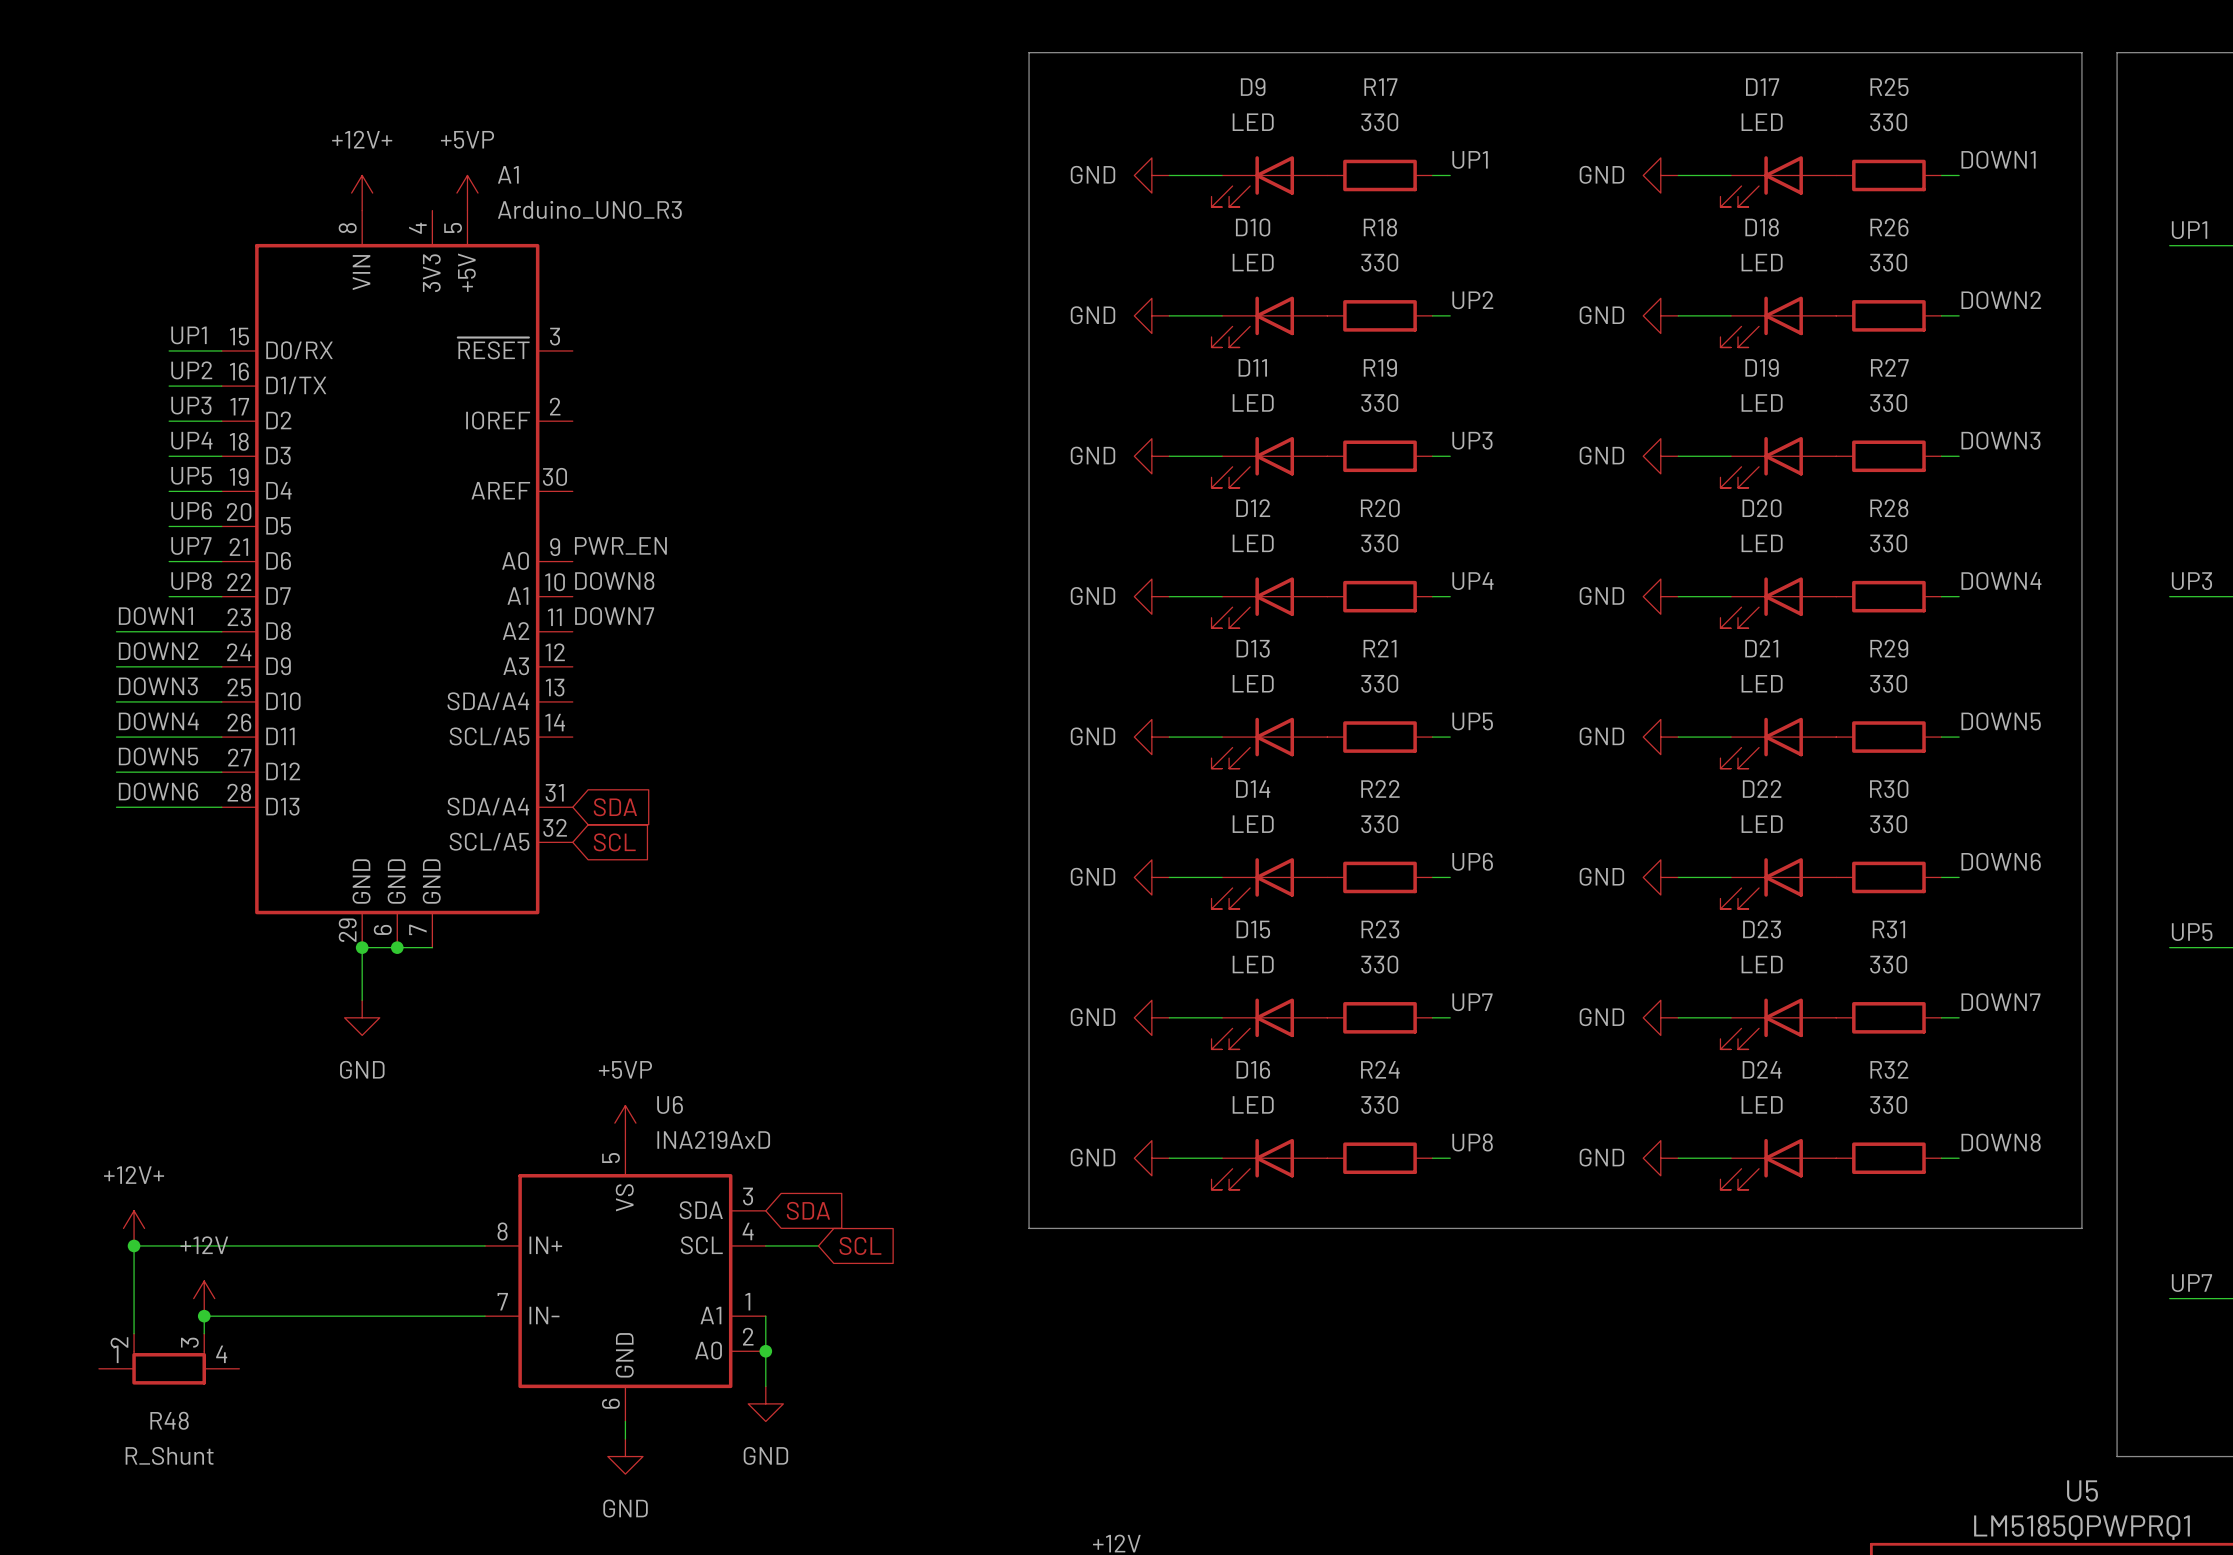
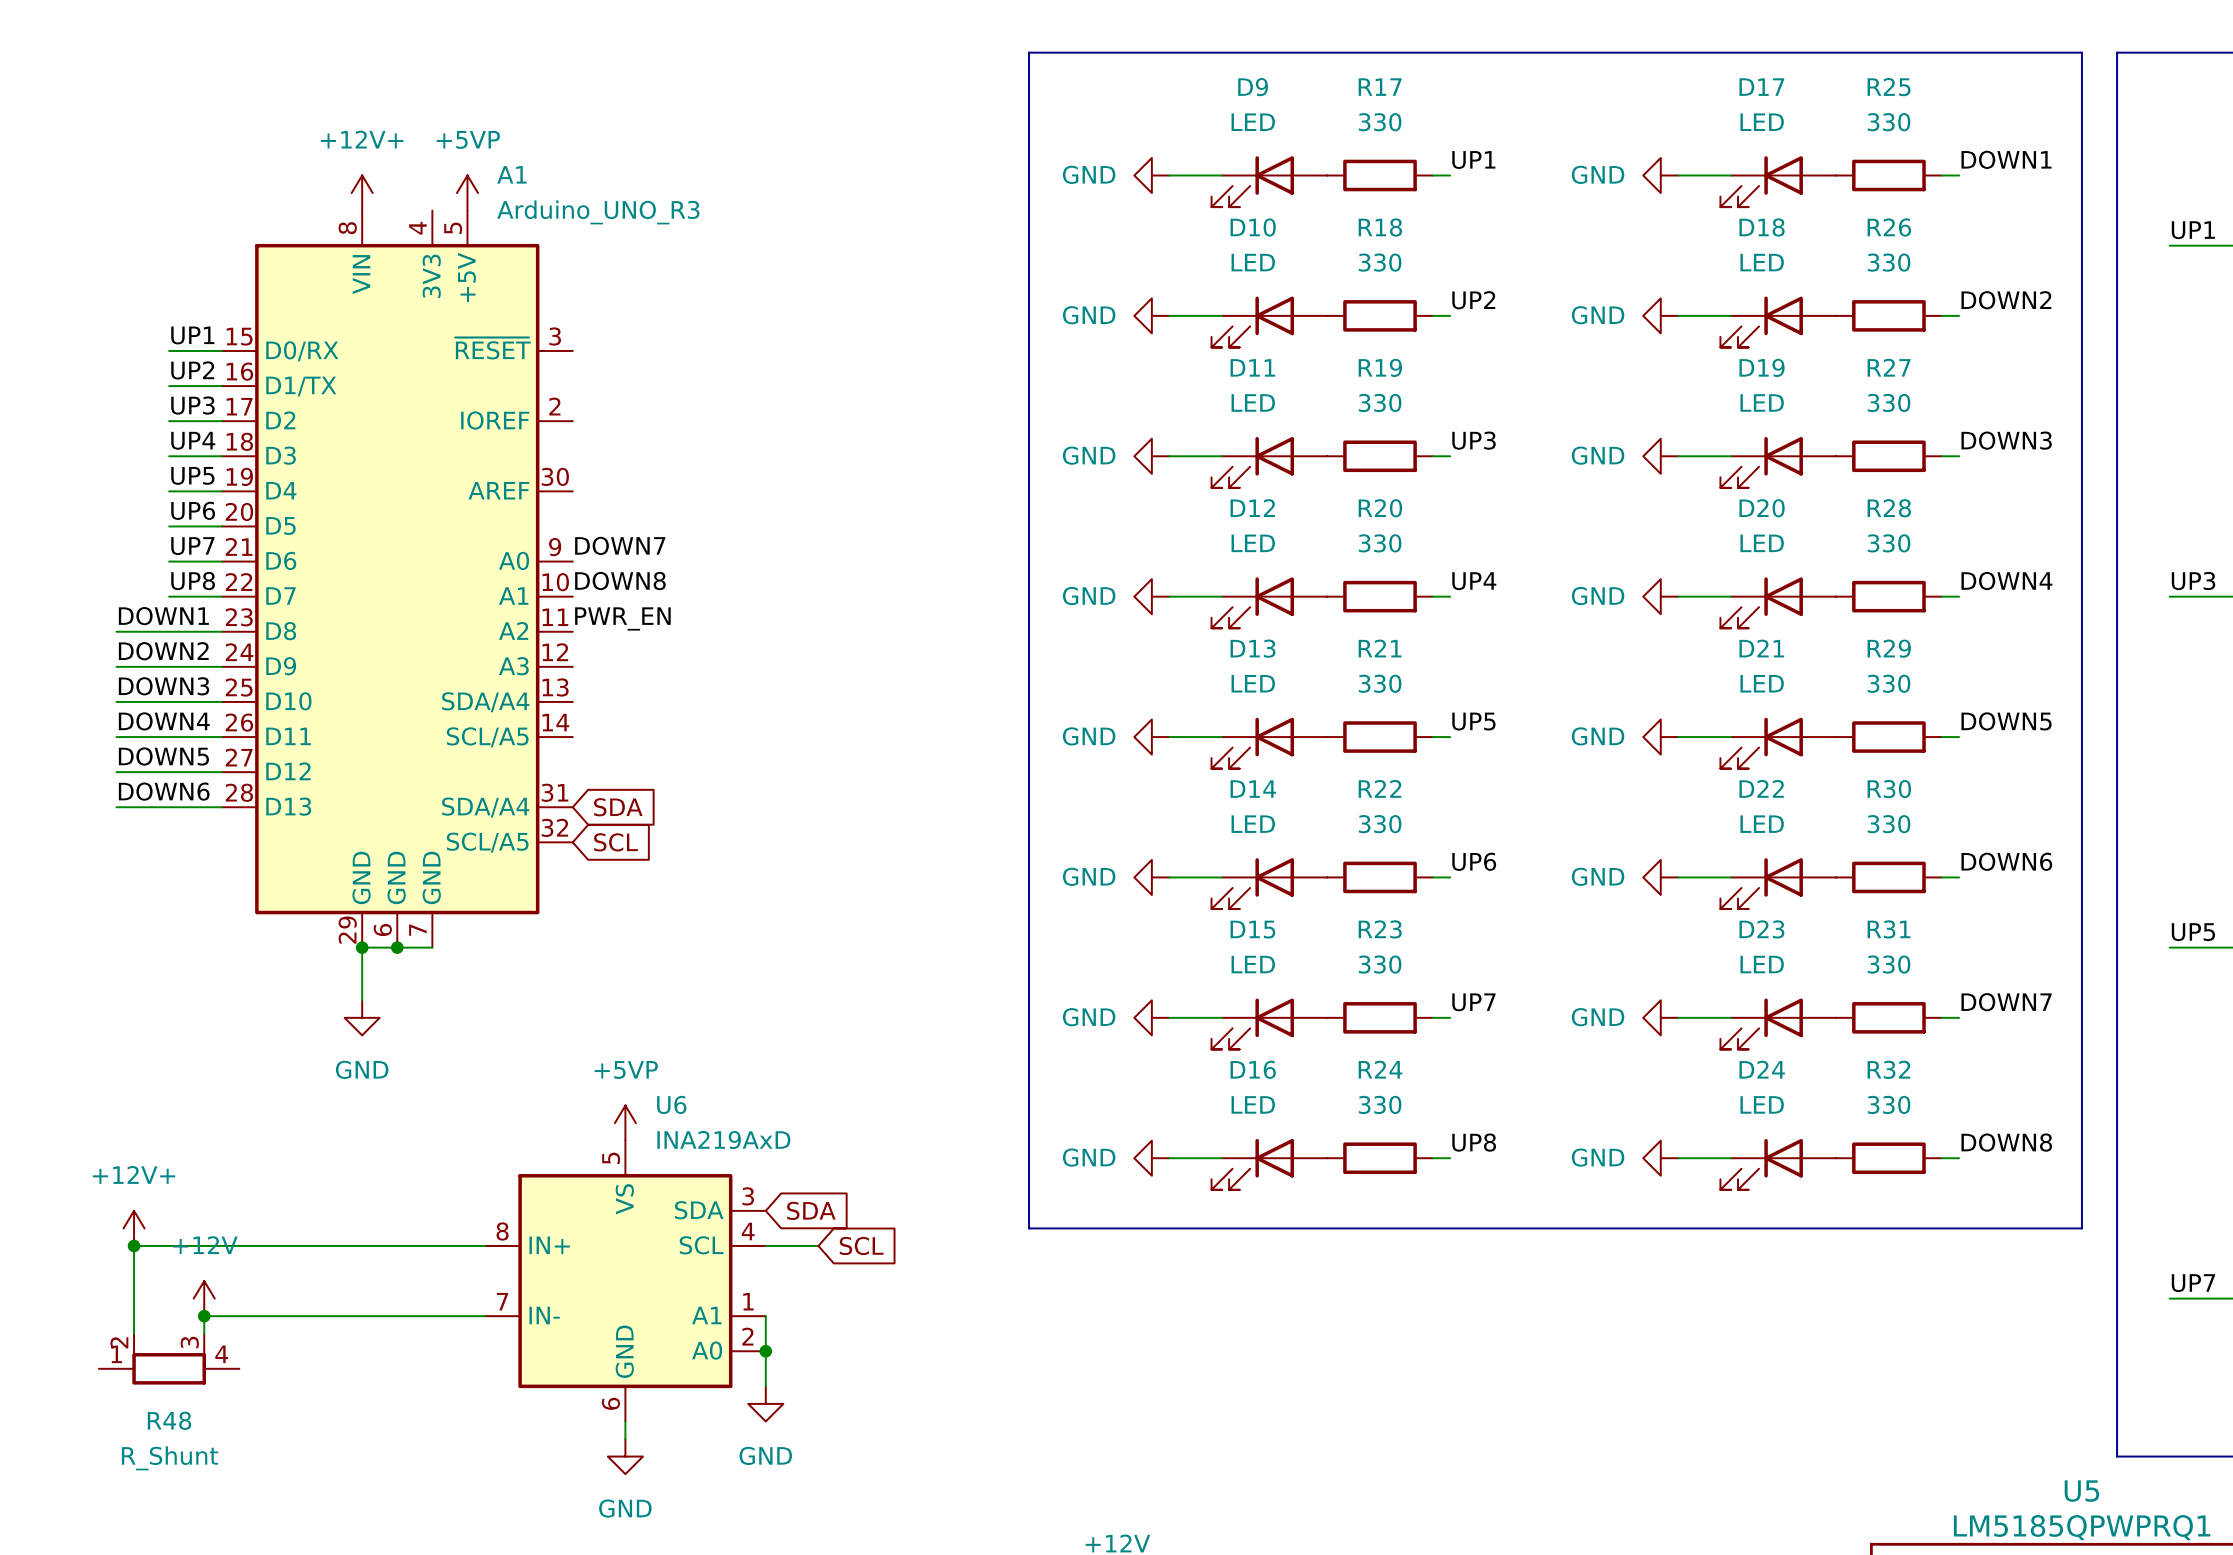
label: PWR_EN (620, 545) -> DOWN7 (620, 545)
label: DOWN7 (614, 616) -> PWR_EN (622, 618)

